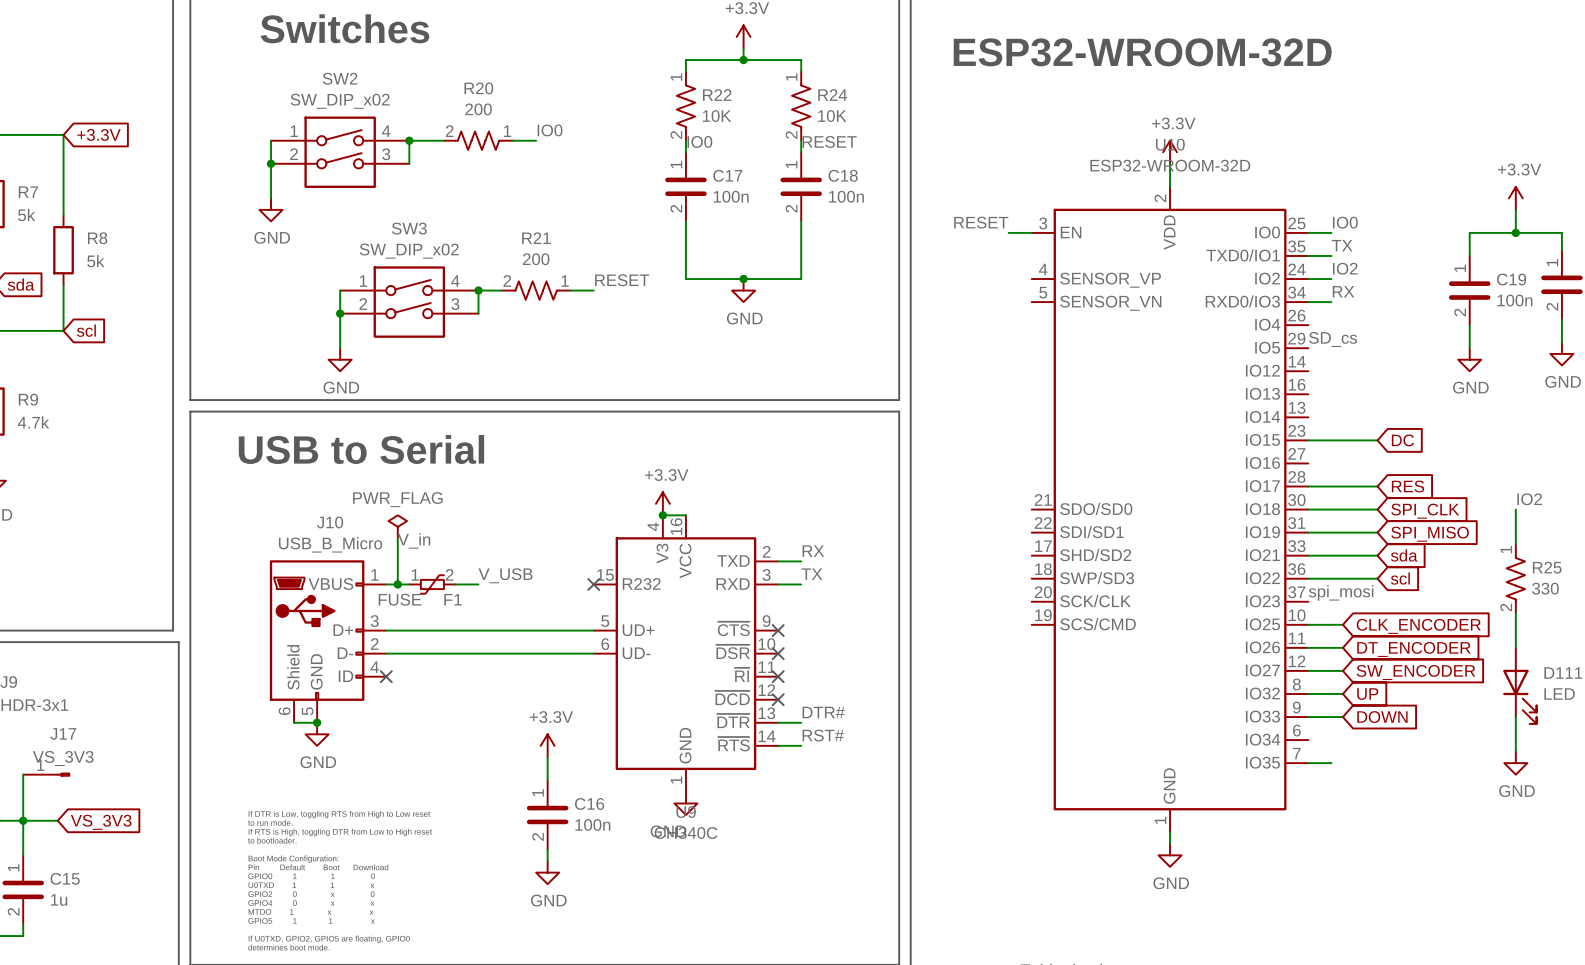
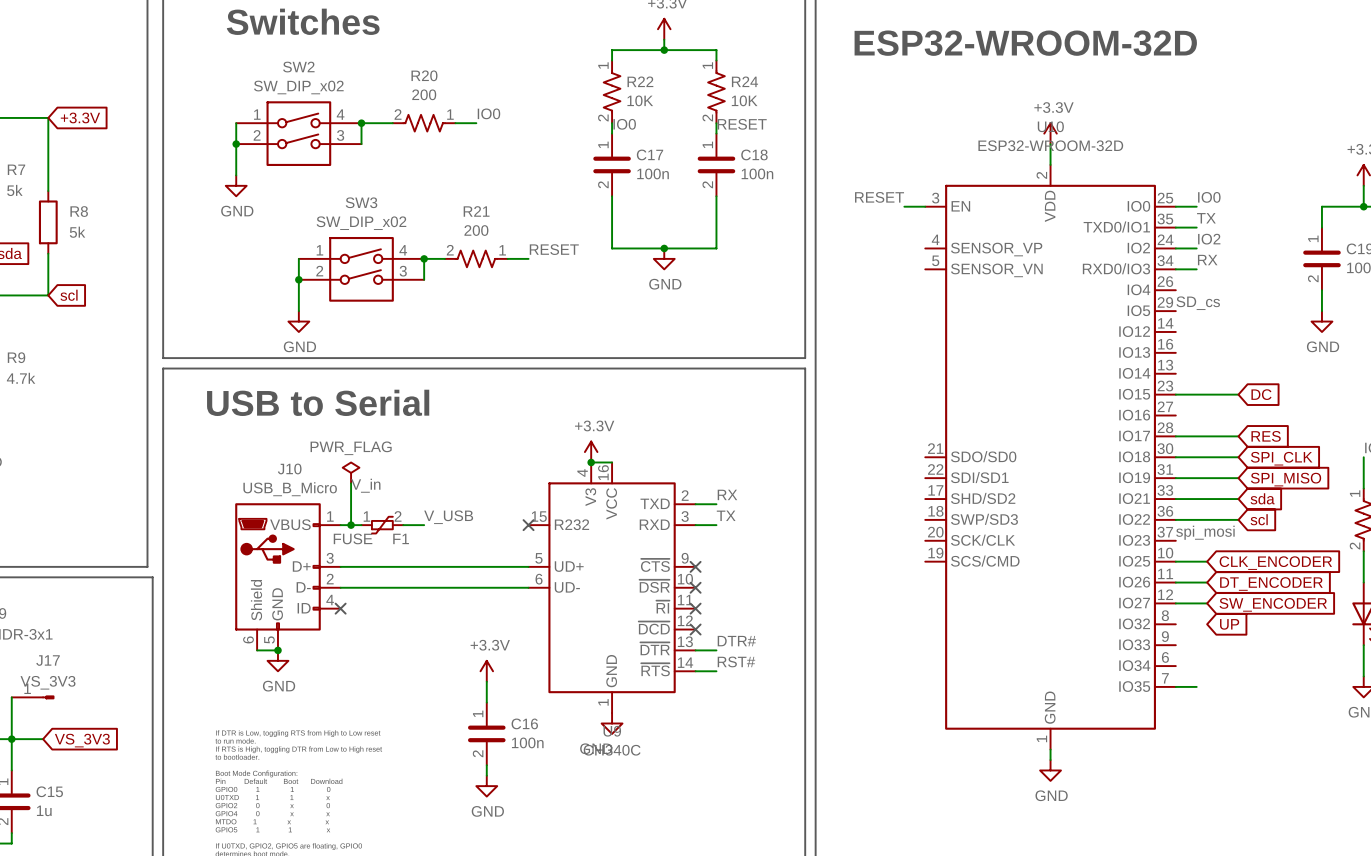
wire: (1308, 693) (1342, 693) -> none
wire: (1308, 717) (1342, 717) -> none
global label: DOWN (1382, 717) -> none

